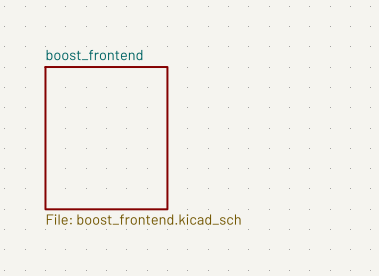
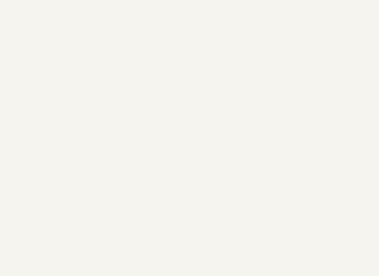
sheet boost_frontend: File: boost_frontend.kicad_sch (106, 138) -> none

